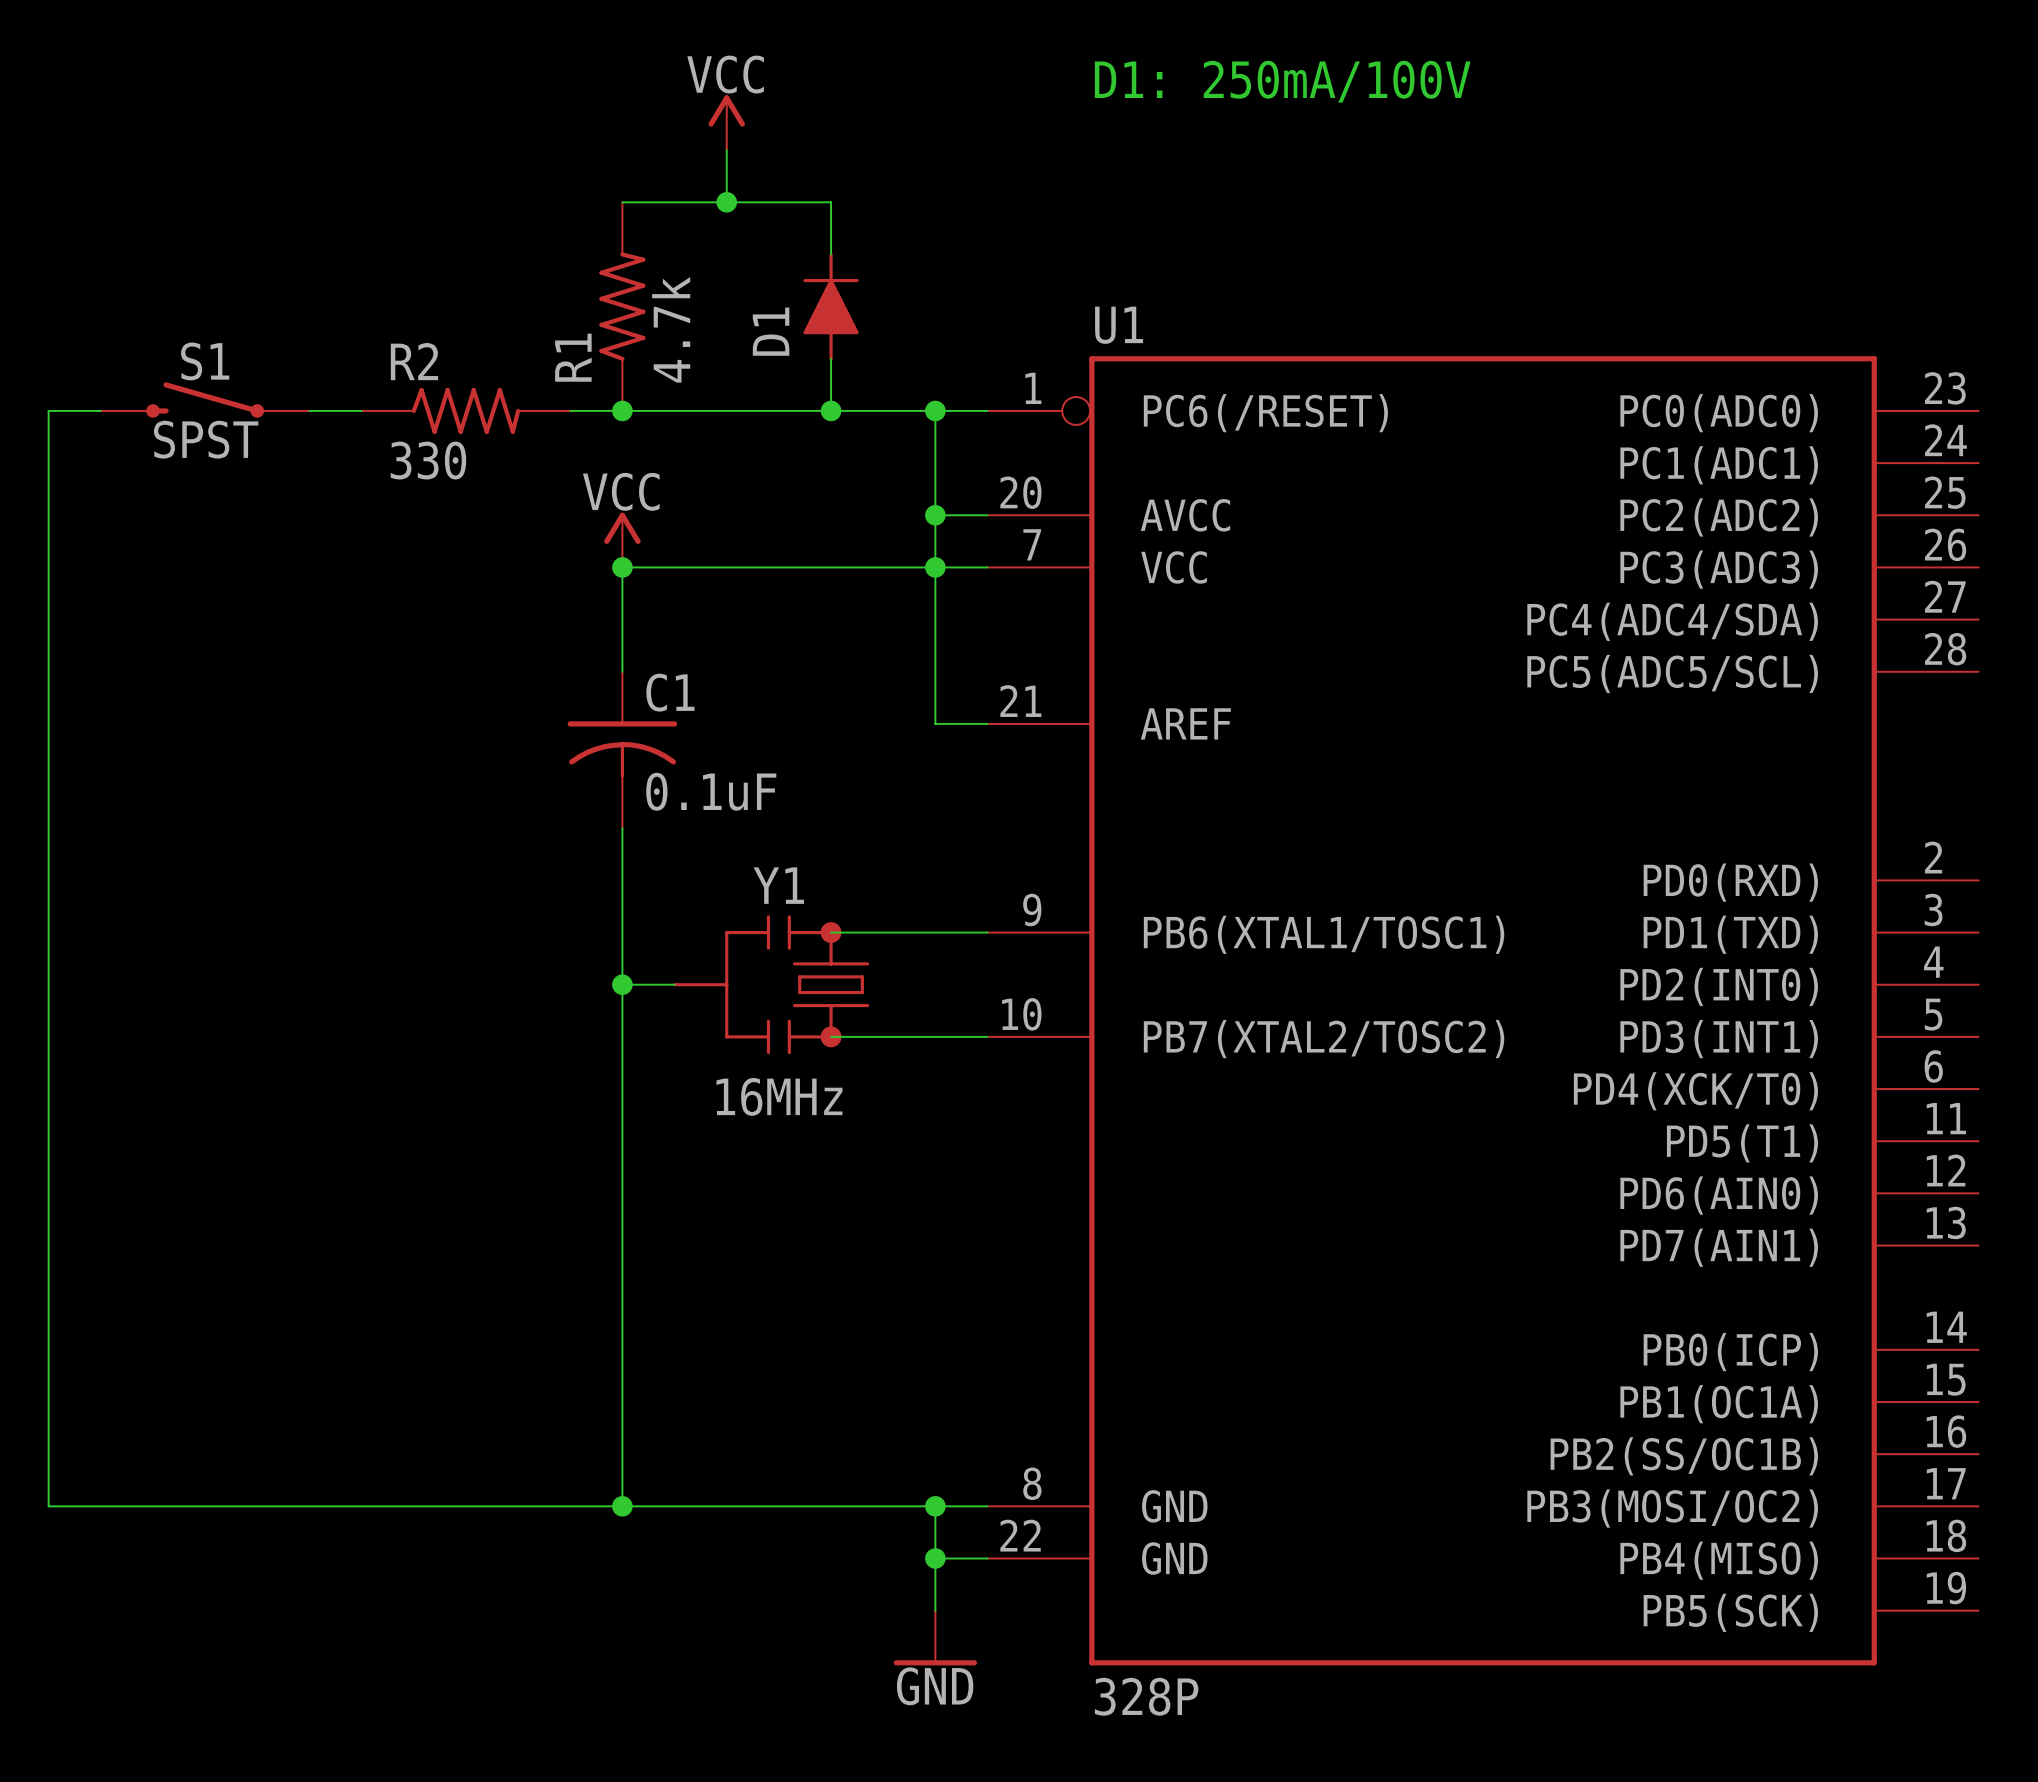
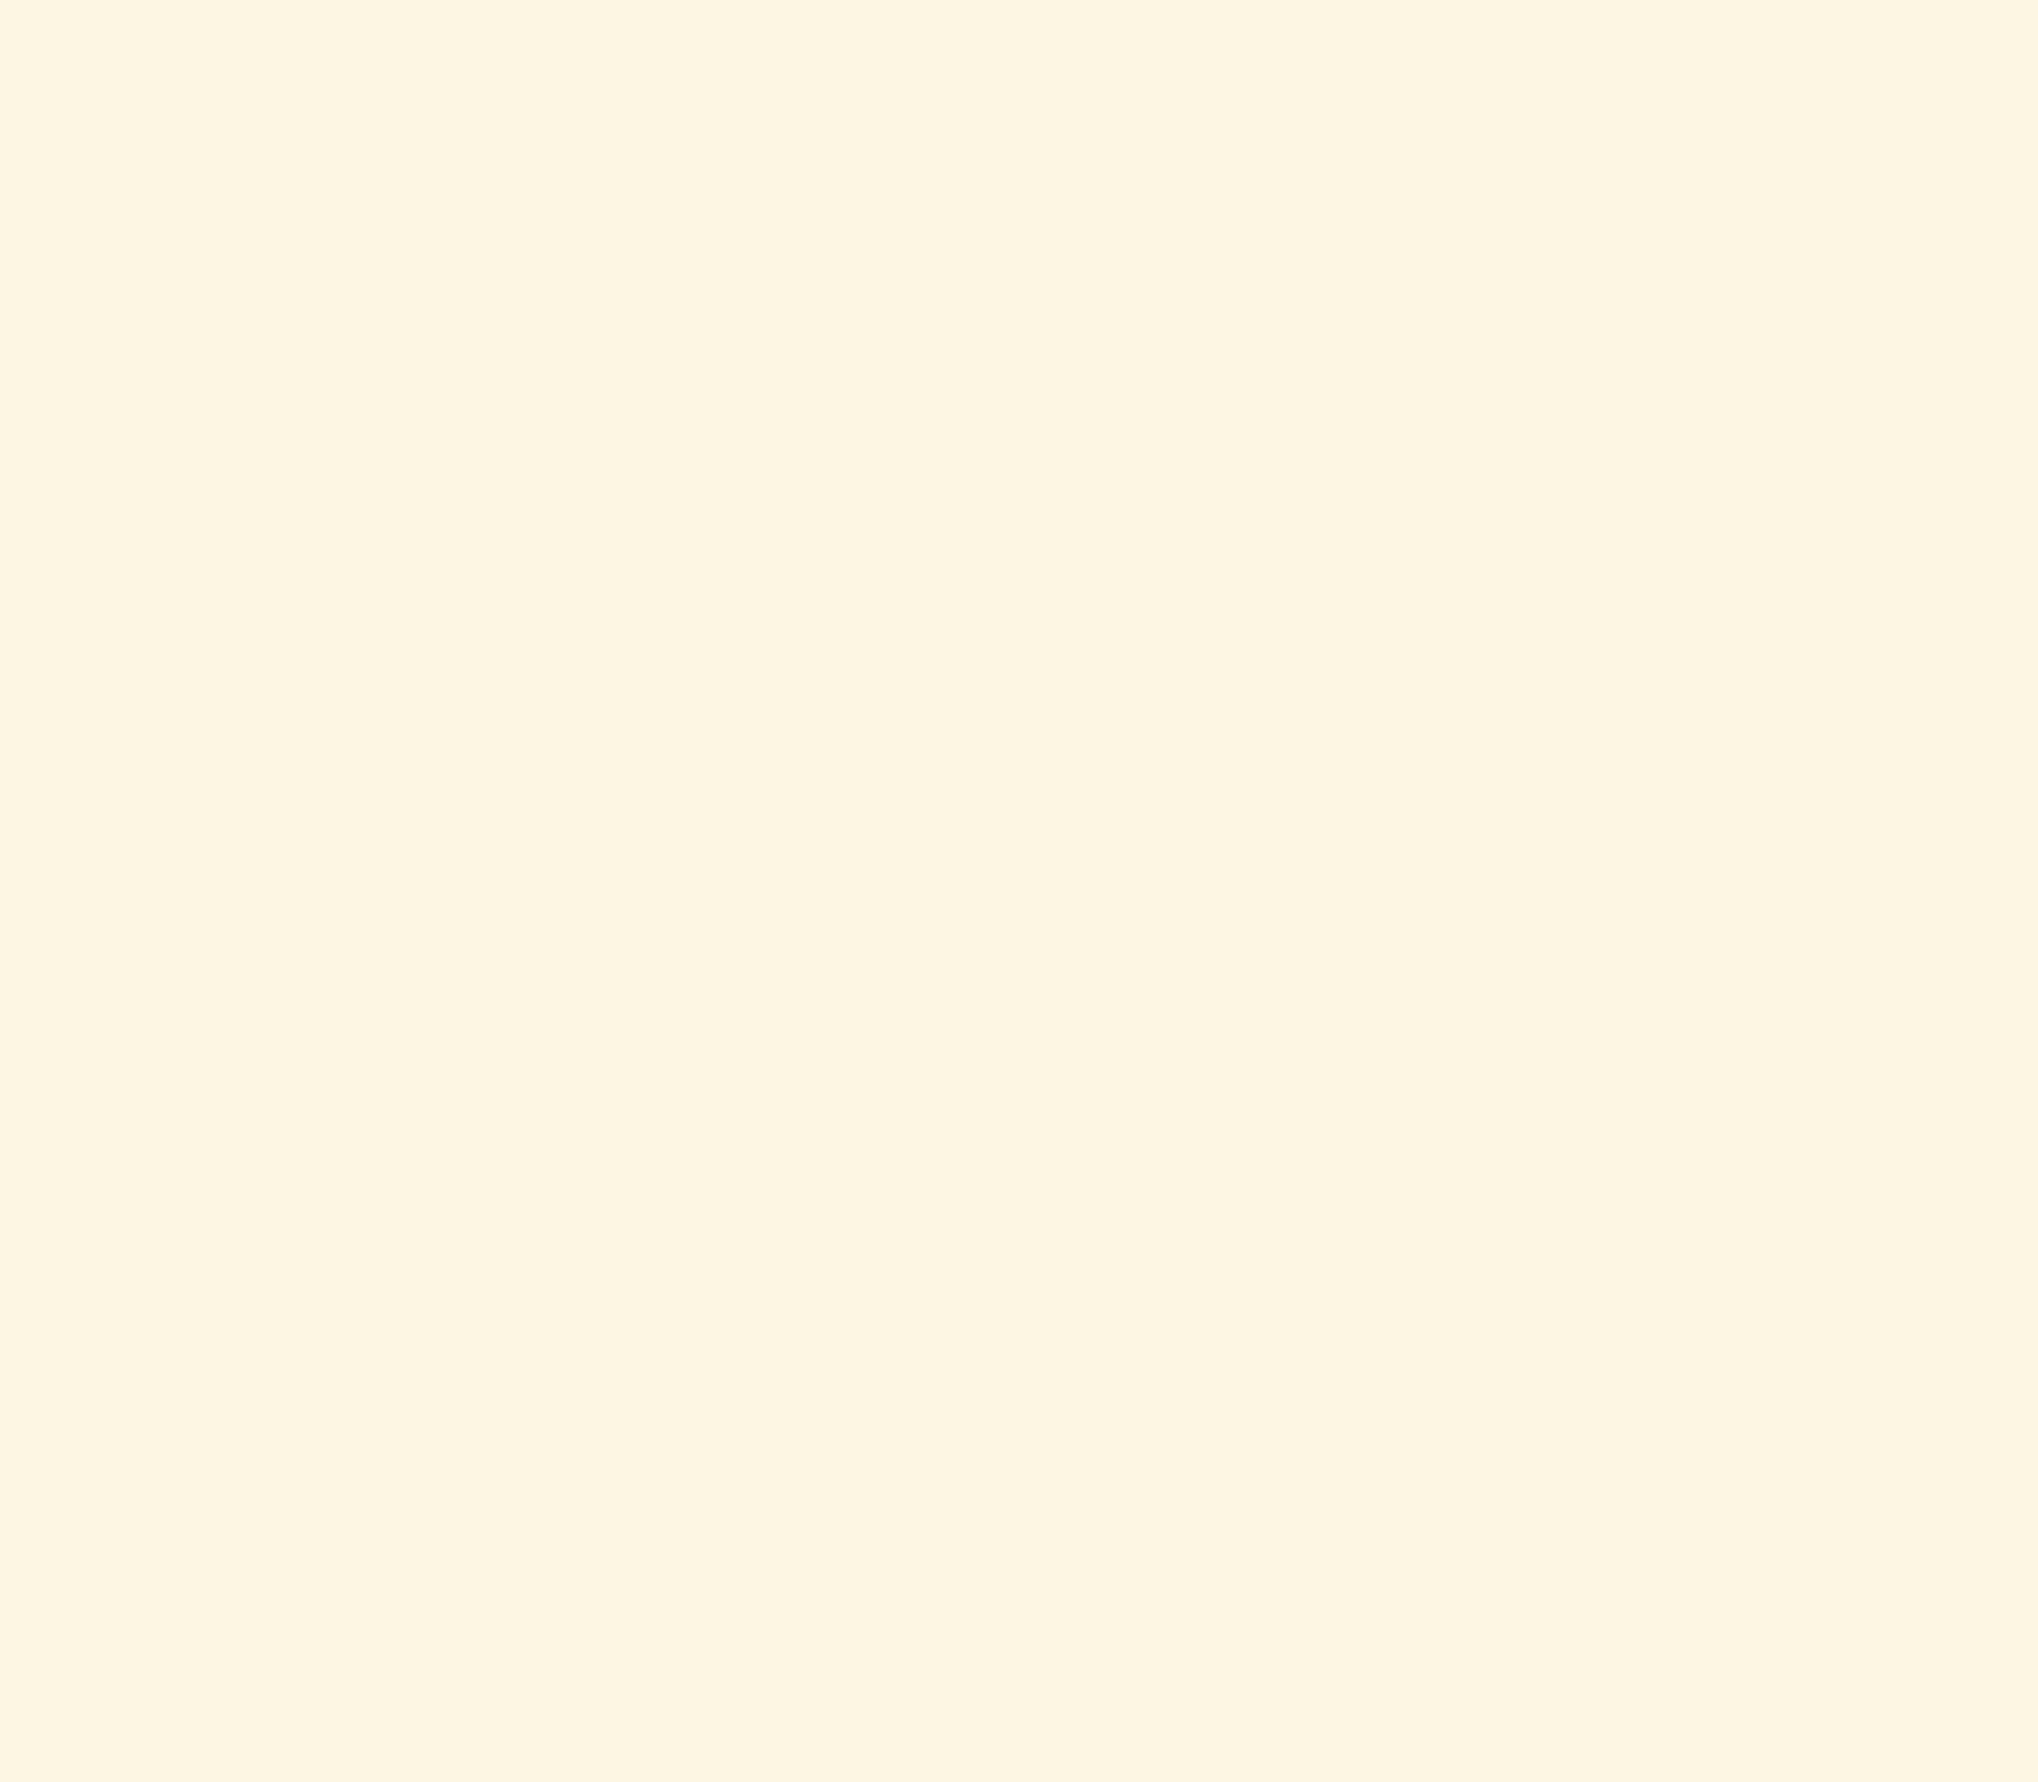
text: D1: 250mA/100V (1282, 81) -> none
power symbol: VCC (726, 122) -> none
wire: (726, 150) (726, 202) -> none
wire: (622, 202) (831, 202) (831, 254) -> none
junction: (726, 202) -> none
R1: 4.7k (622, 306) -> none
D1: (831, 306) -> none
wire: (831, 358) (831, 410) -> none
S1: SPST (205, 400) -> none
wire: (100, 410) (48, 410) (48, 1506) (987, 1506) -> none
wire: (309, 410) (361, 410) -> none
R2: 330 (465, 410) -> none
wire: (570, 410) (987, 410) -> none
junction: (622, 410) -> none
junction: (831, 410) -> none
wire: (935, 410) (935, 723) (987, 723) -> none
junction: (935, 410) -> none
wire: (935, 515) (987, 515) -> none
junction: (935, 515) -> none
power symbol: VCC (622, 540) -> none
junction: (622, 567) -> none
junction: (935, 567) -> none
wire: (987, 567) (622, 567) (622, 671) -> none
C1: 0.1uF (622, 750) -> none
wire: (622, 828) (622, 1506) -> none
wire: (831, 932) (987, 932) -> none
wire: (622, 984) (674, 984) -> none
junction: (622, 984) -> none
Y1: 16MHz (771, 984) -> none
U1: 328P (1483, 1010) -> none
wire: (831, 1036) (987, 1036) -> none
junction: (622, 1506) -> none
wire: (935, 1506) (935, 1610) -> none
junction: (935, 1506) -> none
wire: (935, 1558) (987, 1558) -> none
junction: (935, 1558) -> none
power symbol: GND (935, 1638) -> none

